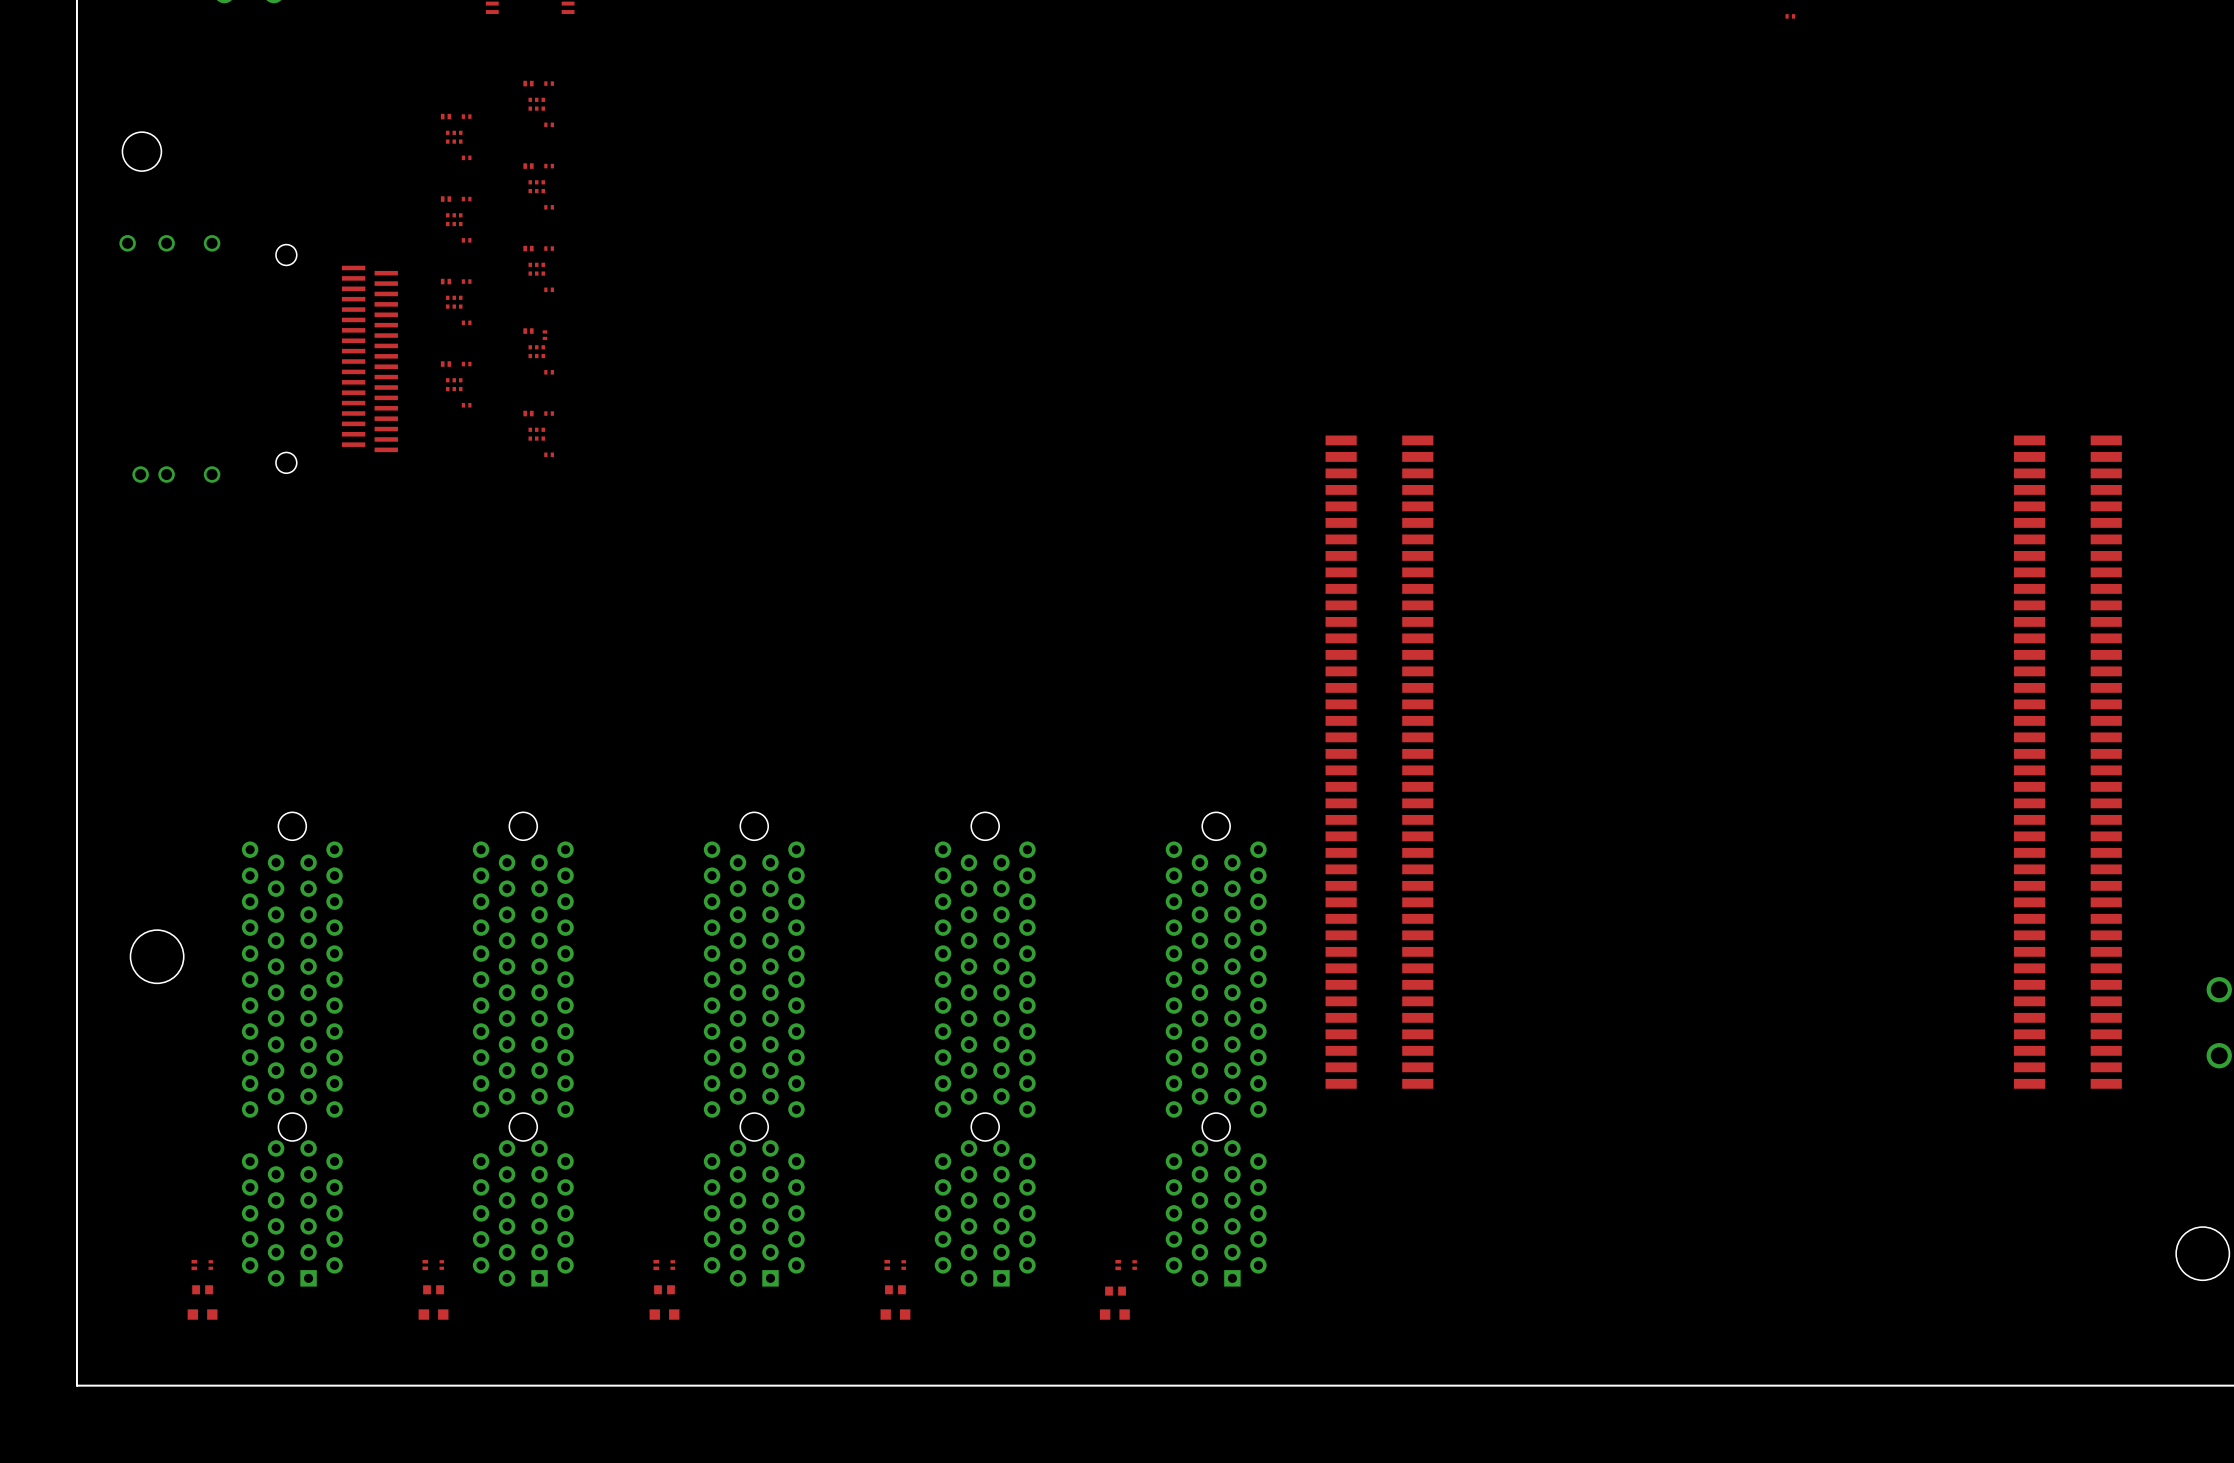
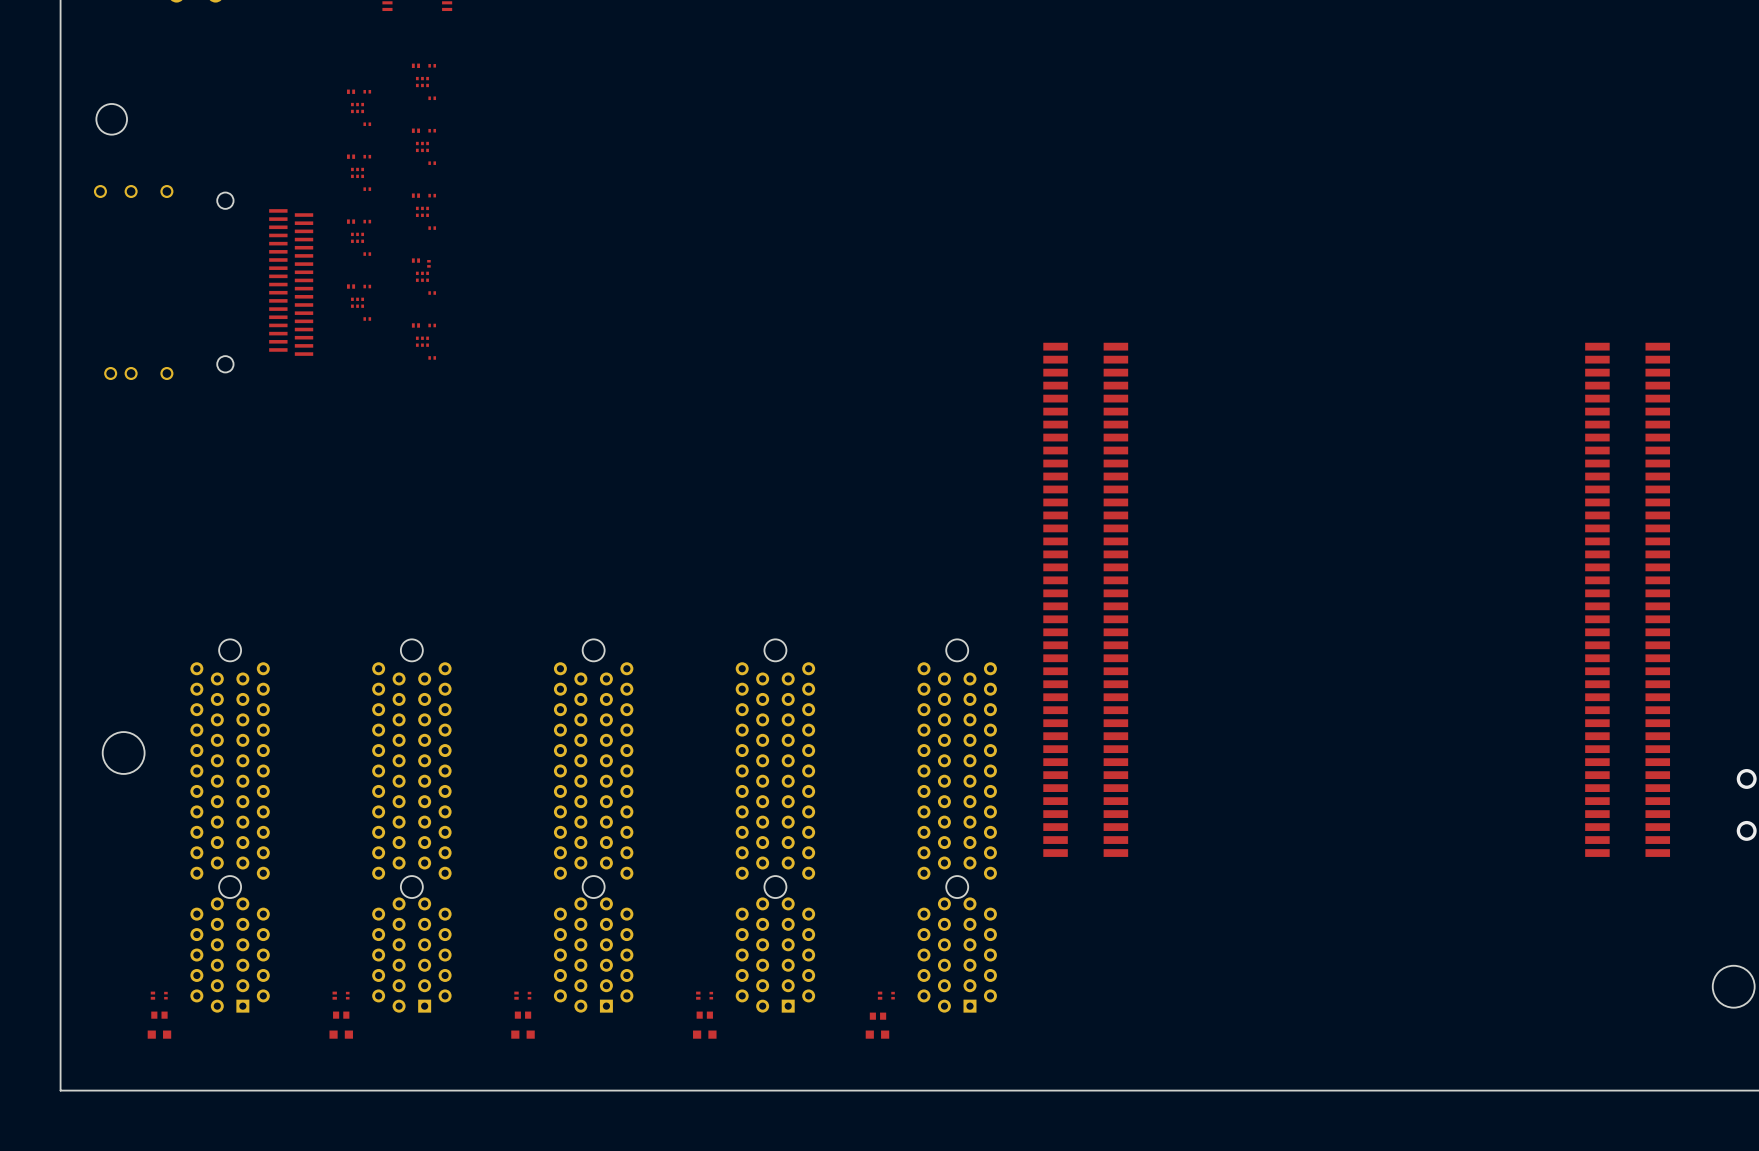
part: (1790, 16) -> none

